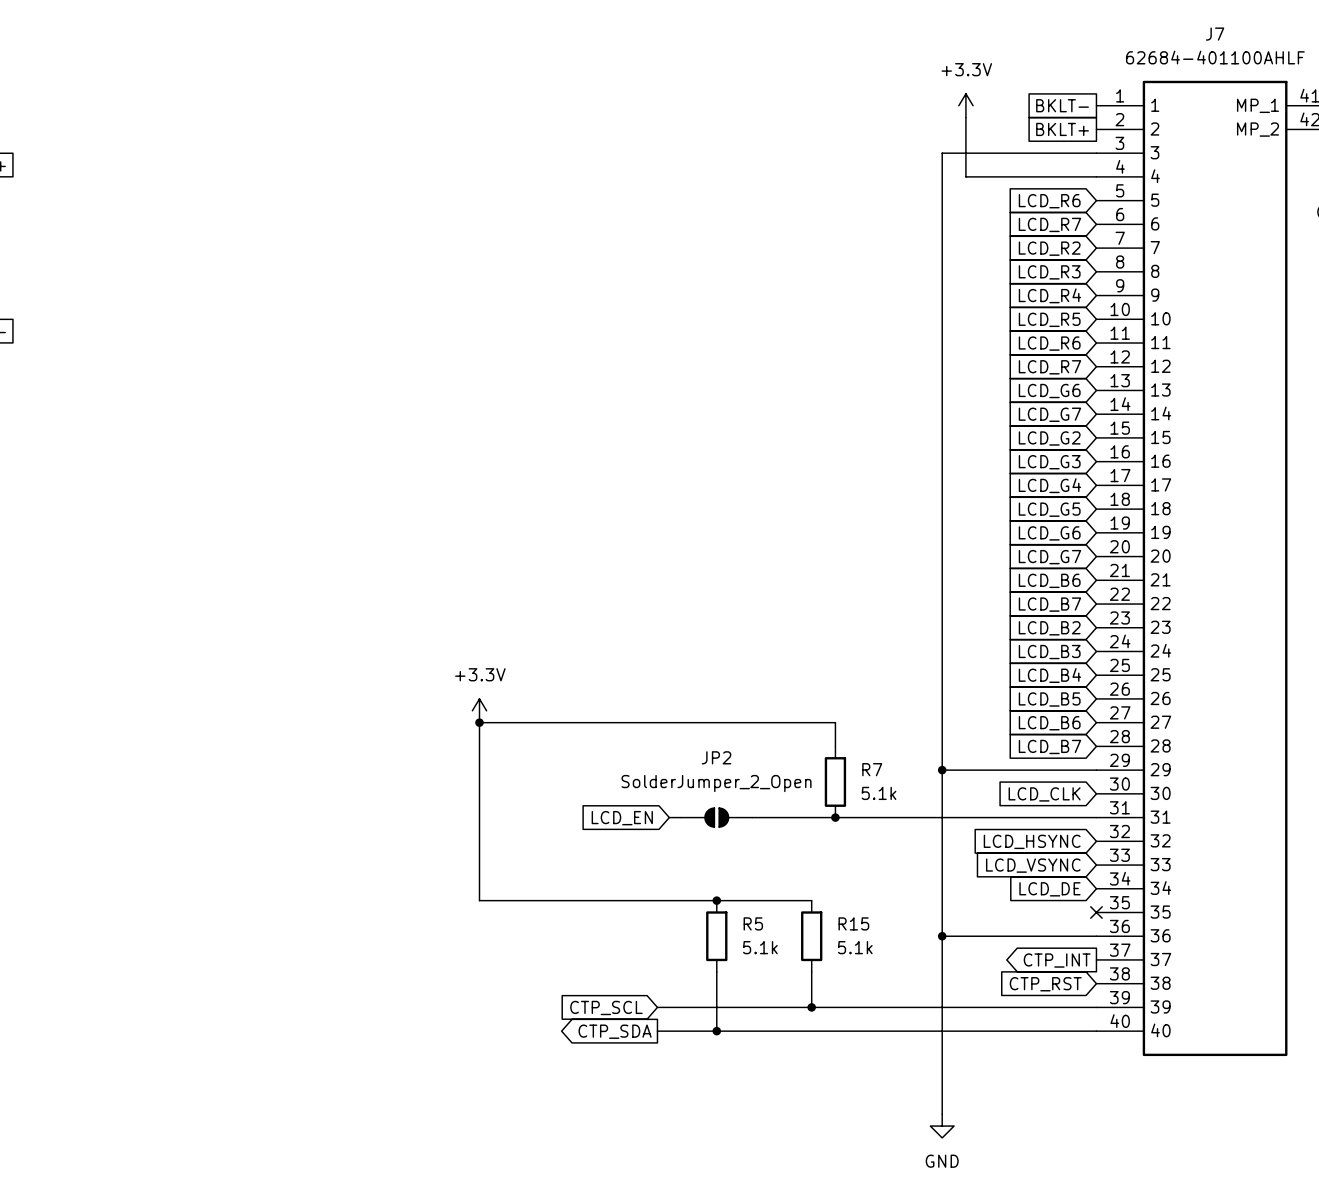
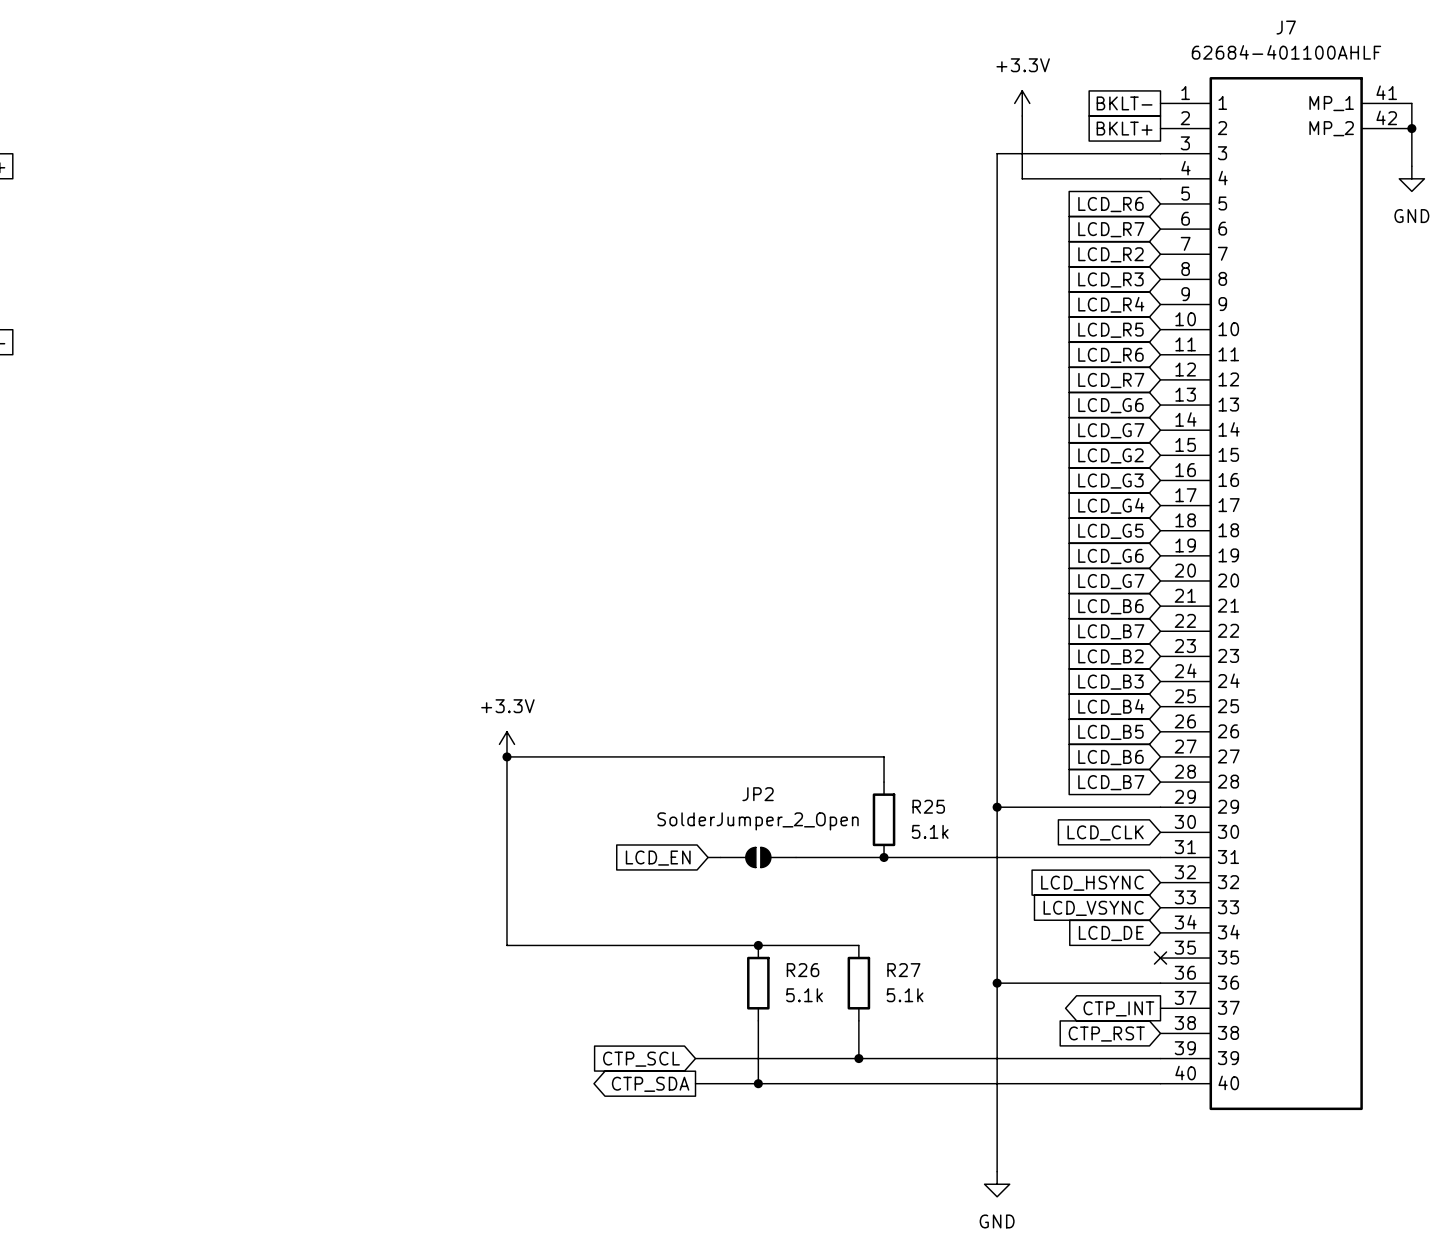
R7 name: R7 (872, 769) -> R25 (928, 806)
R5 name: R5 (753, 923) -> R26 (803, 970)
R15 name: R15 (853, 923) -> R27 (903, 970)

